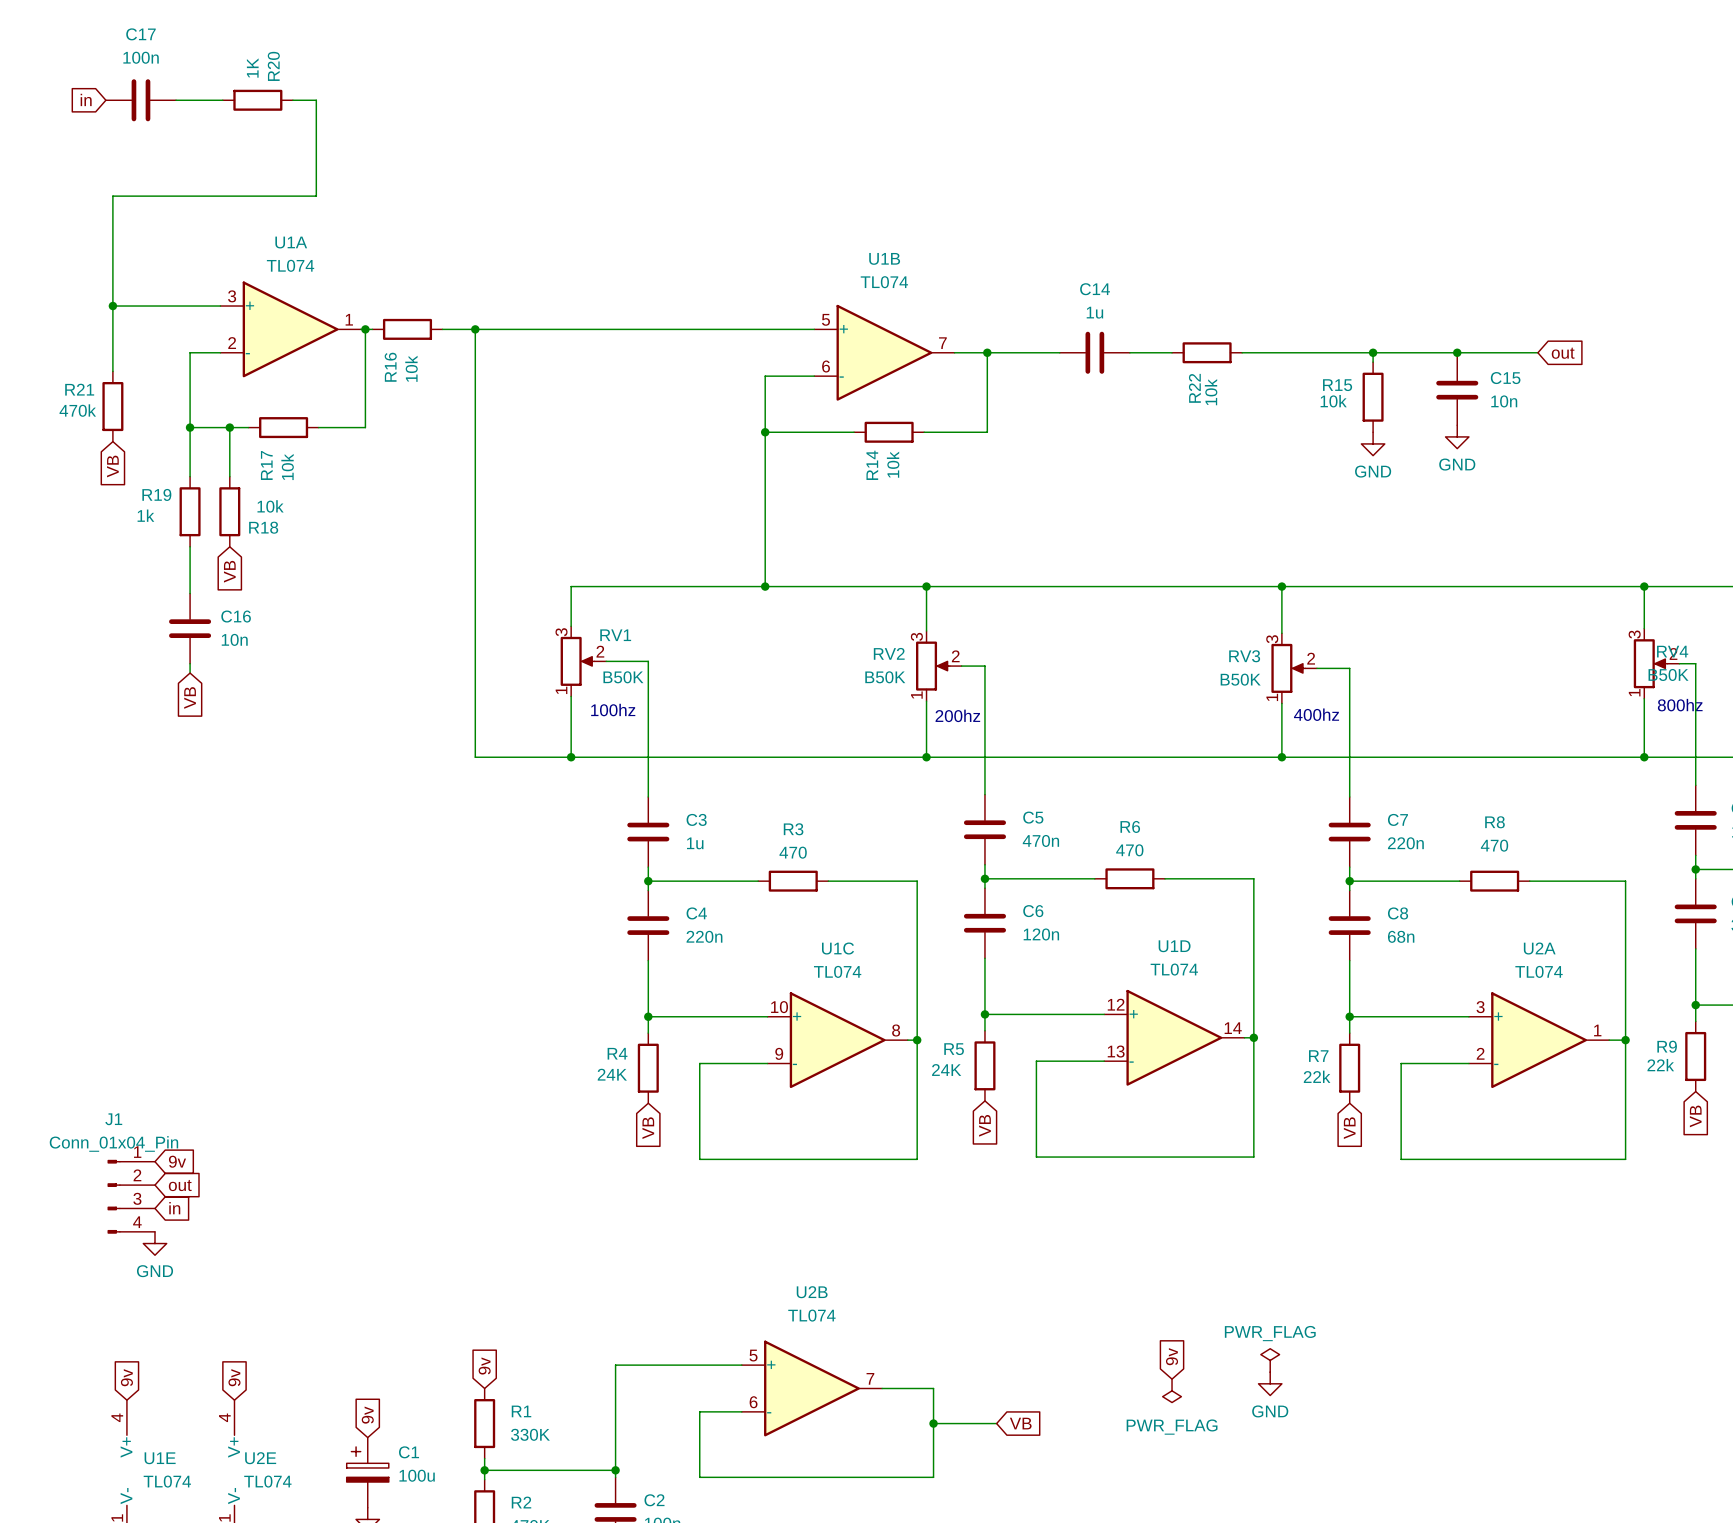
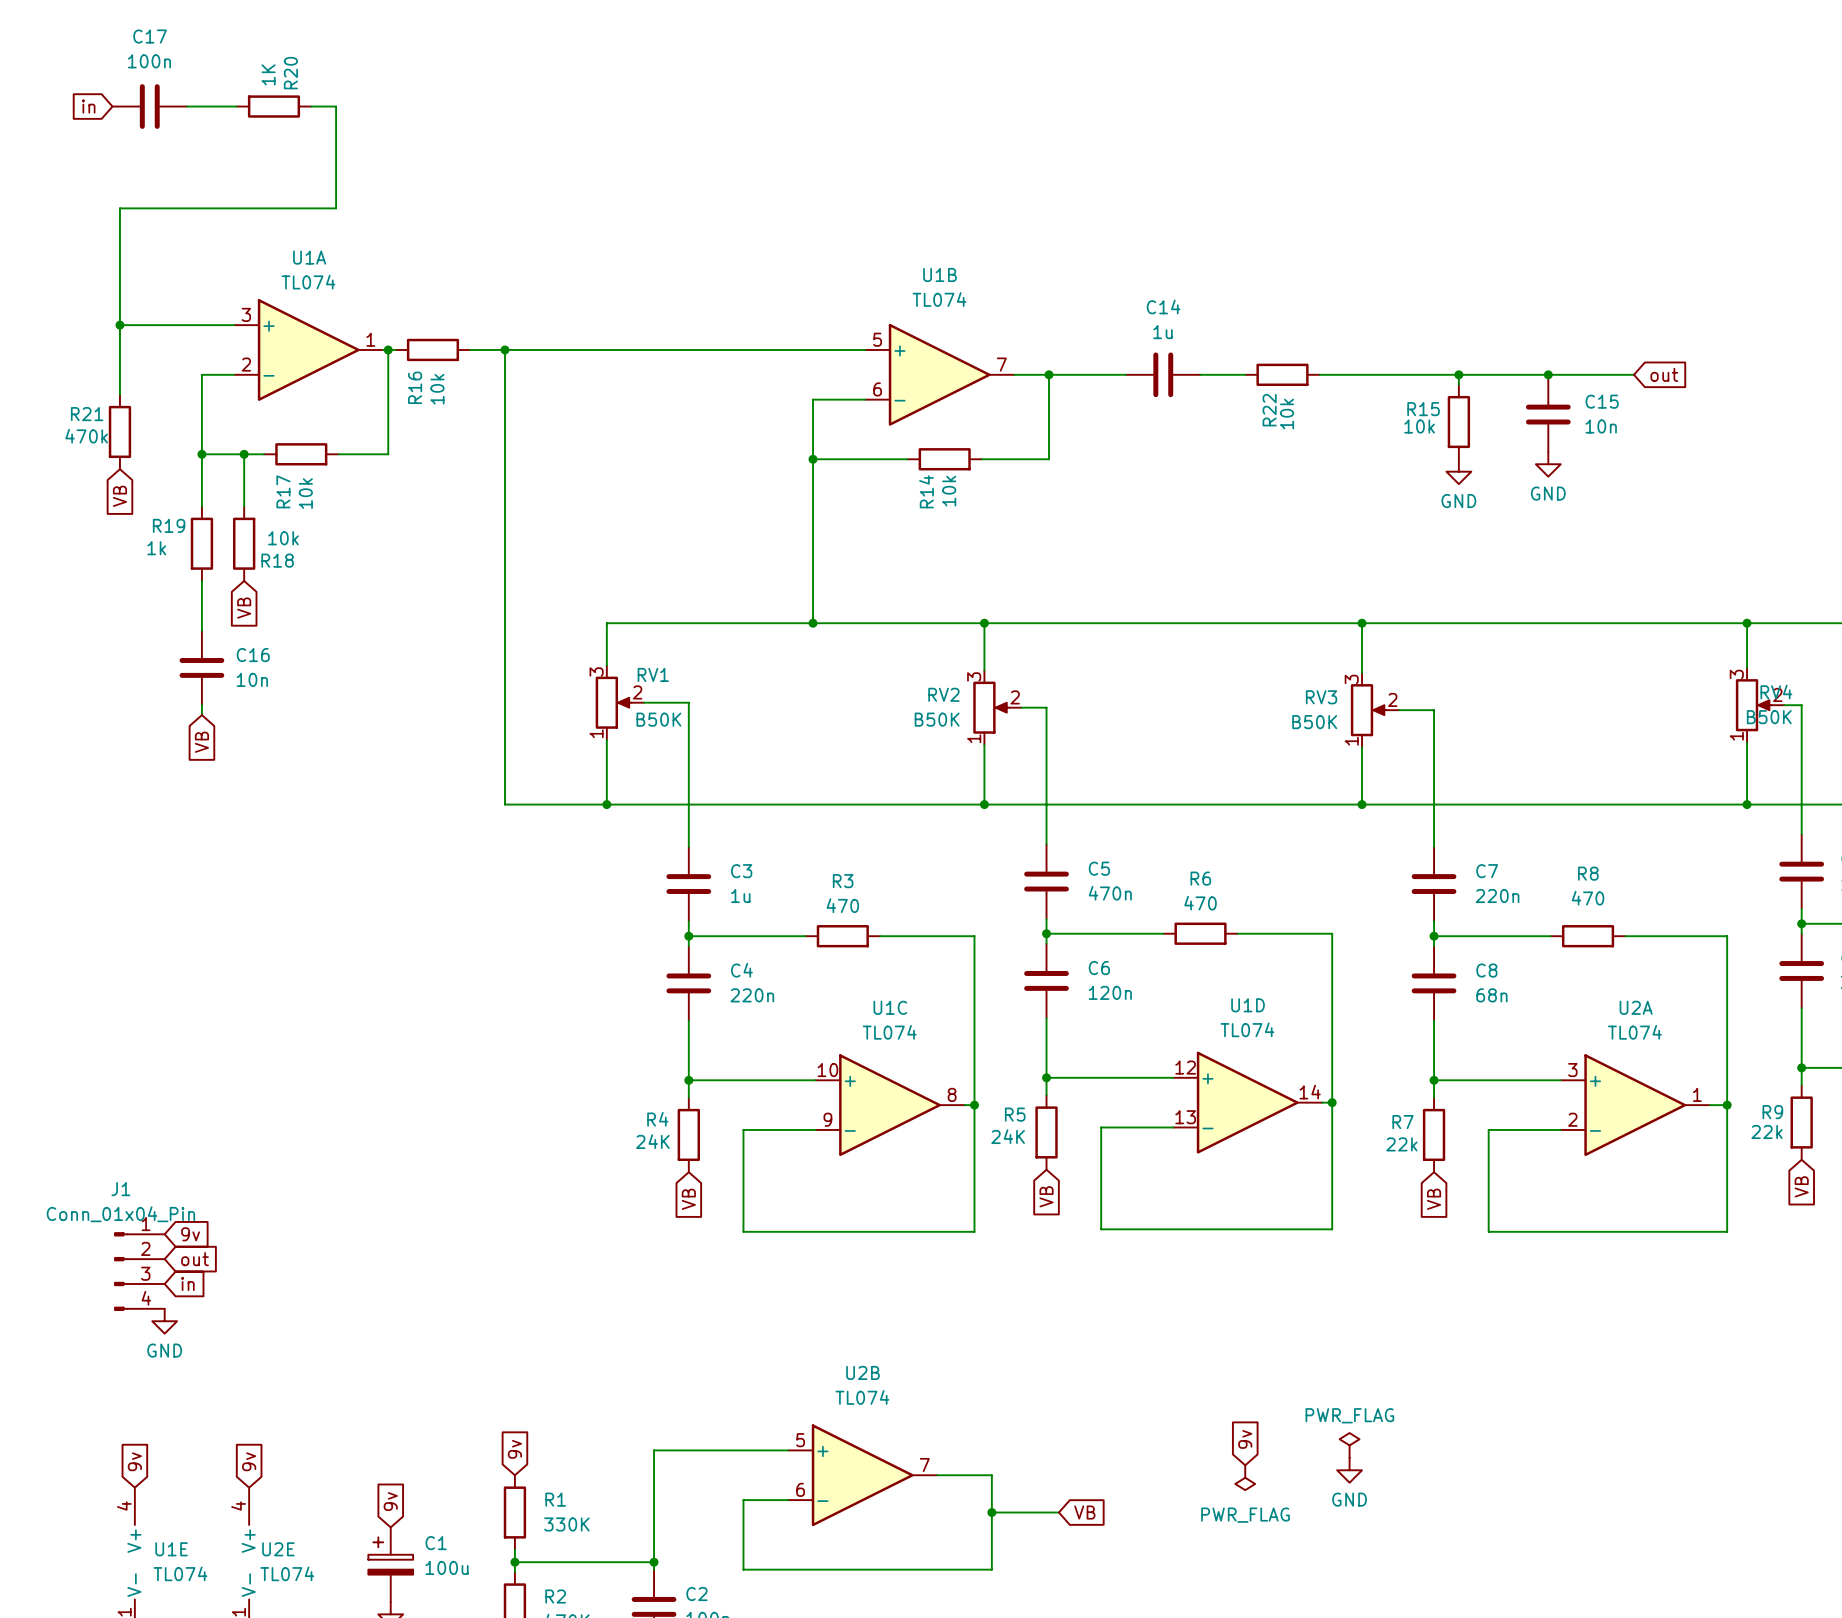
text: 800hz (1680, 705) -> none
text: 100hz (613, 710) -> none
text: 400hz (1316, 714) -> none
text: 200hz (957, 715) -> none

